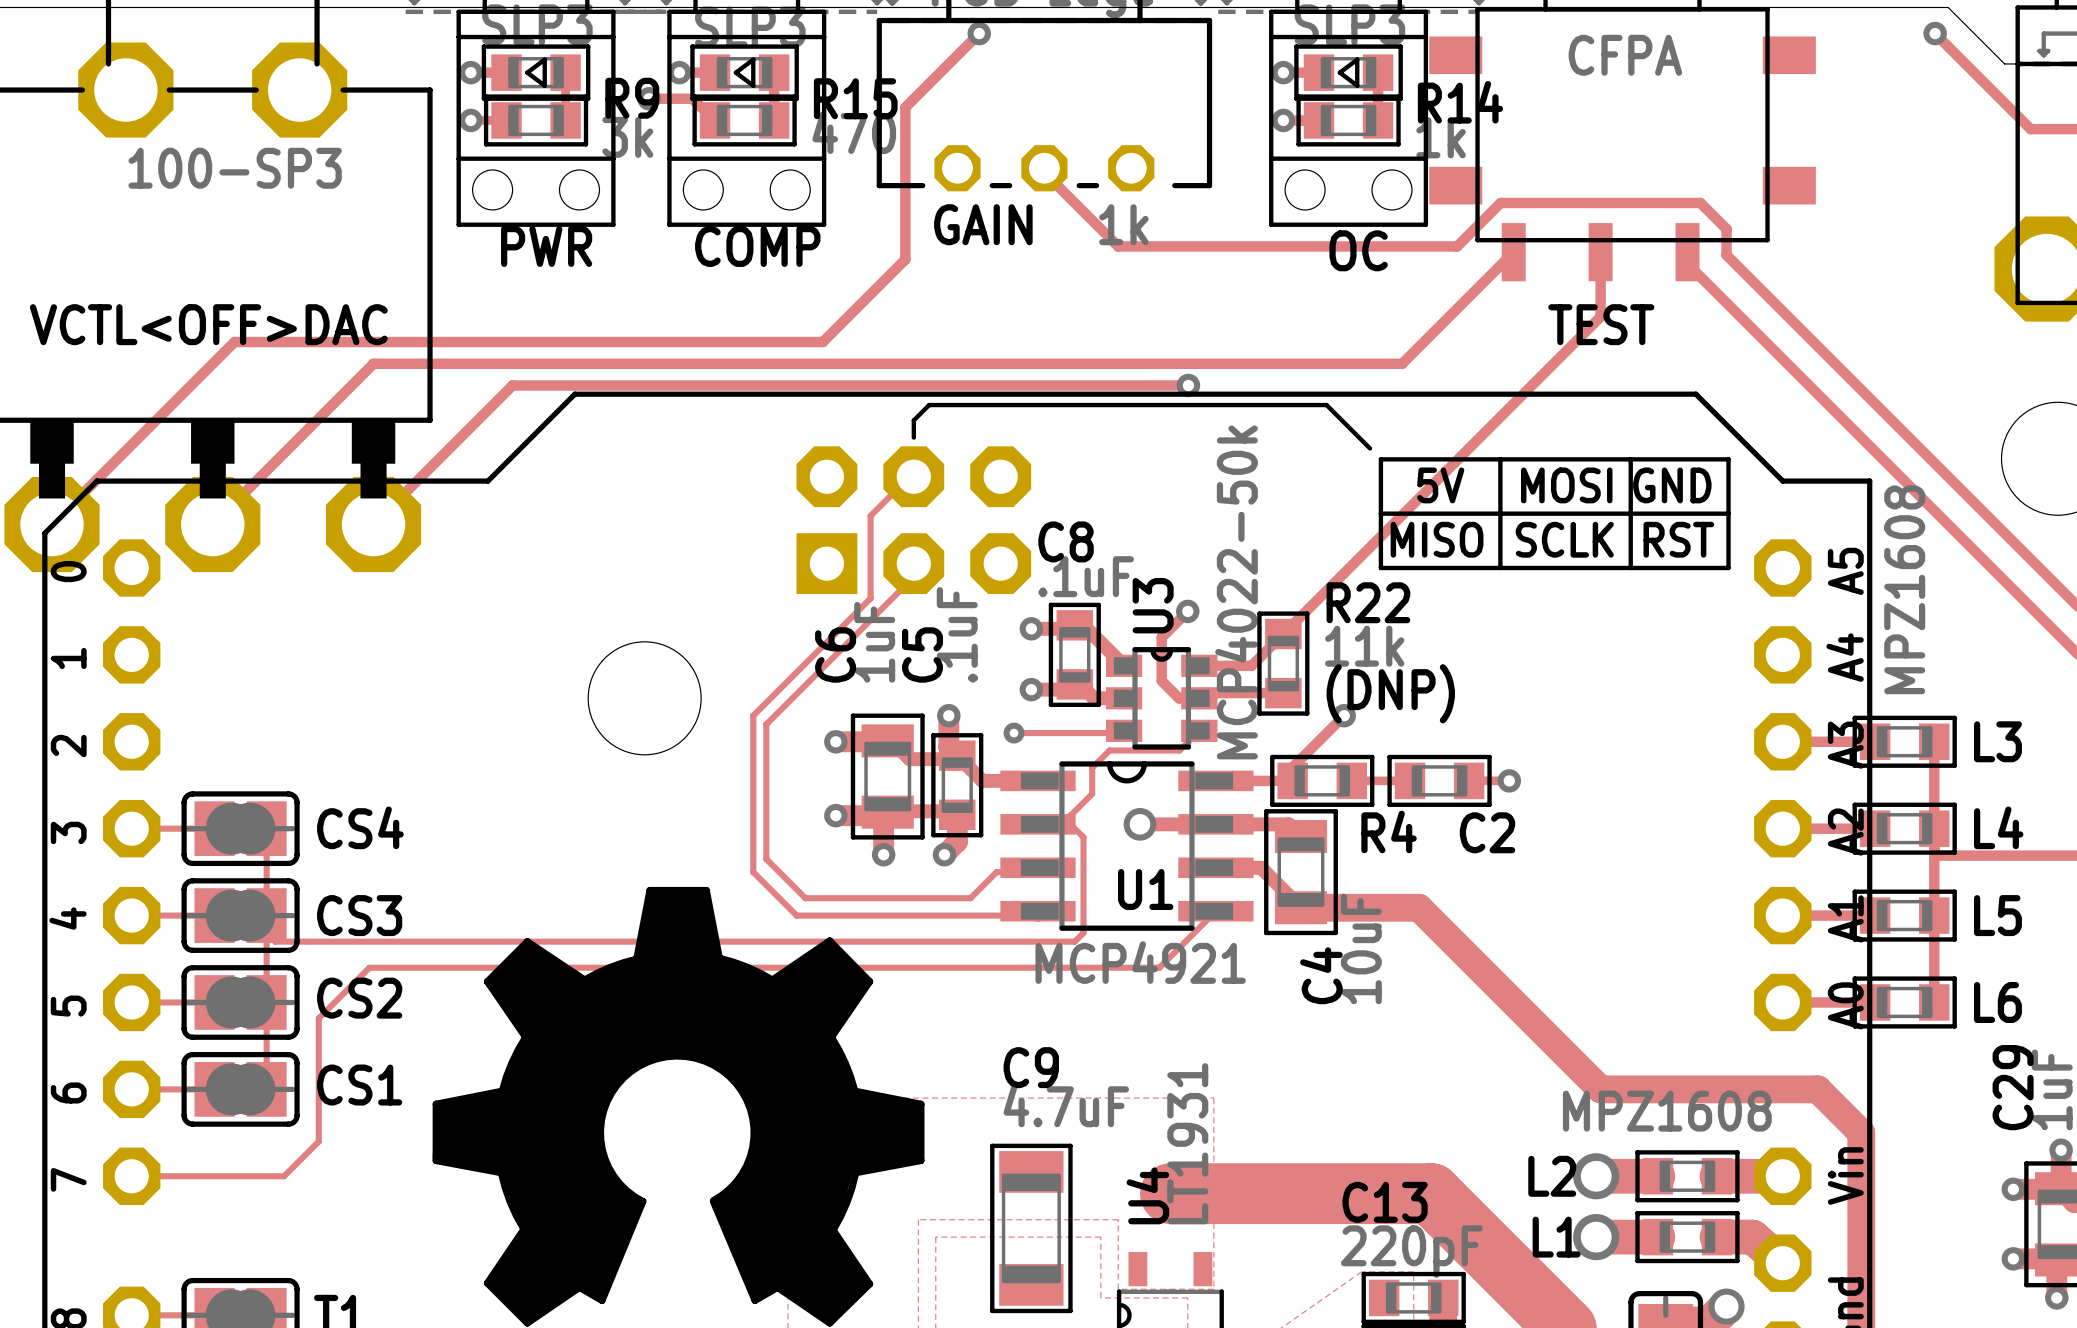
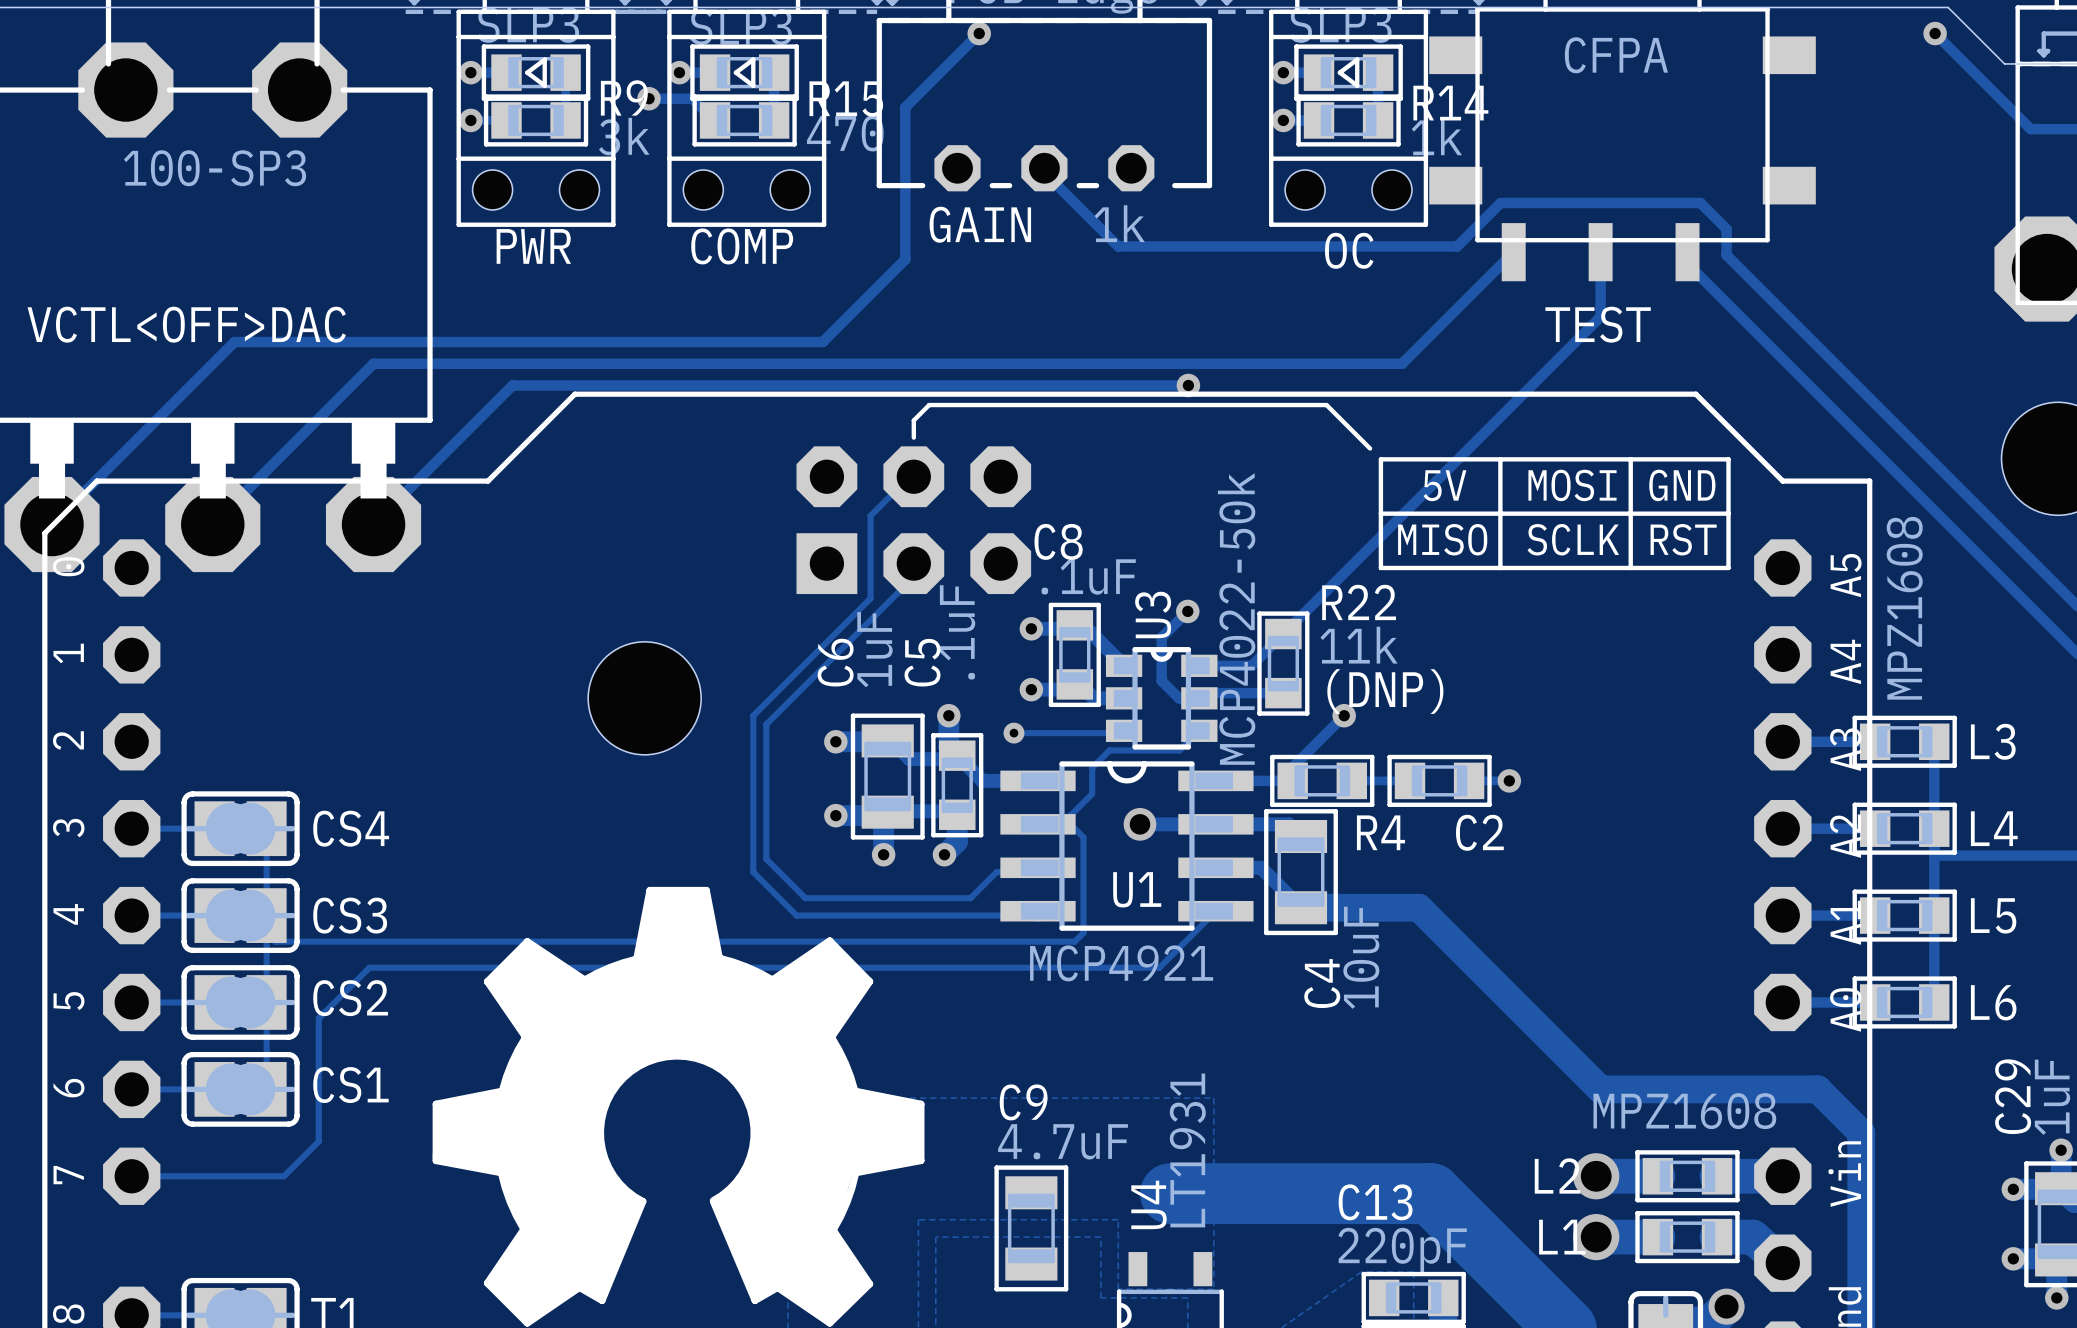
C9 name position: C9 (1031, 1067) -> C9 (1023, 1102)
C9 value position: 4.7uF (1066, 1105) -> 4.7uF (1063, 1141)
C9 footprint: [990, 1143, 1073, 1314] -> [994, 1165, 1069, 1292]

